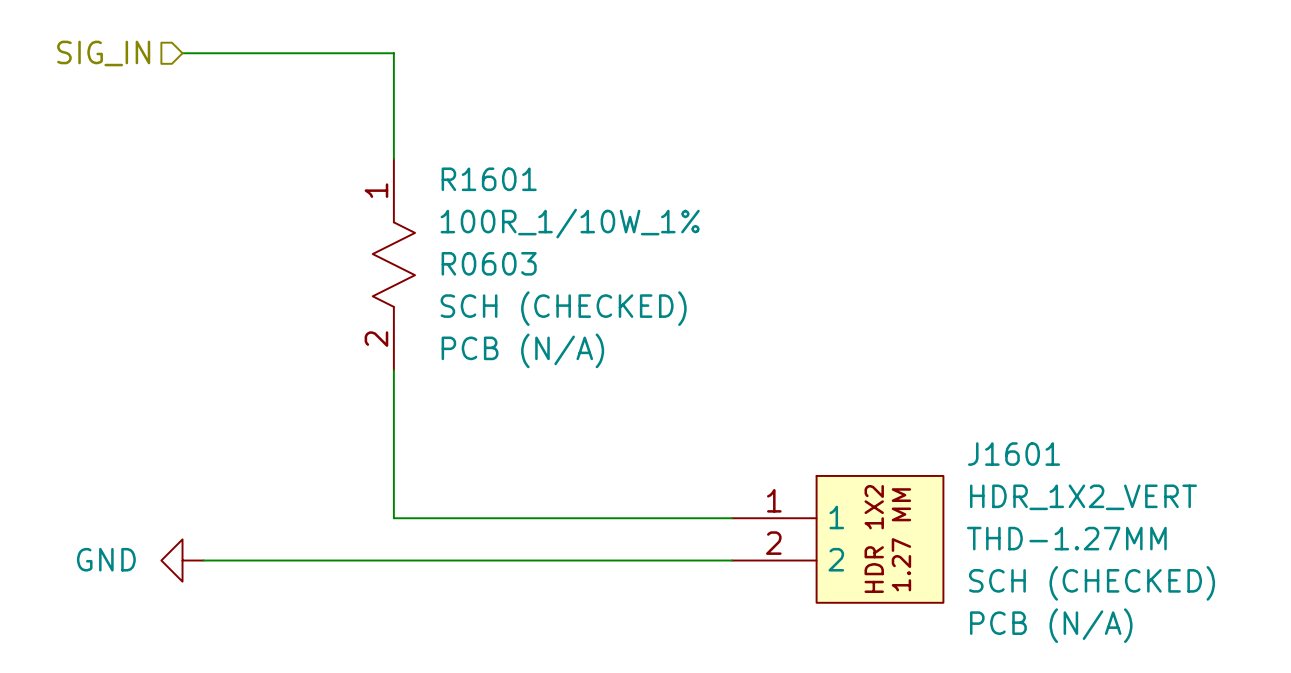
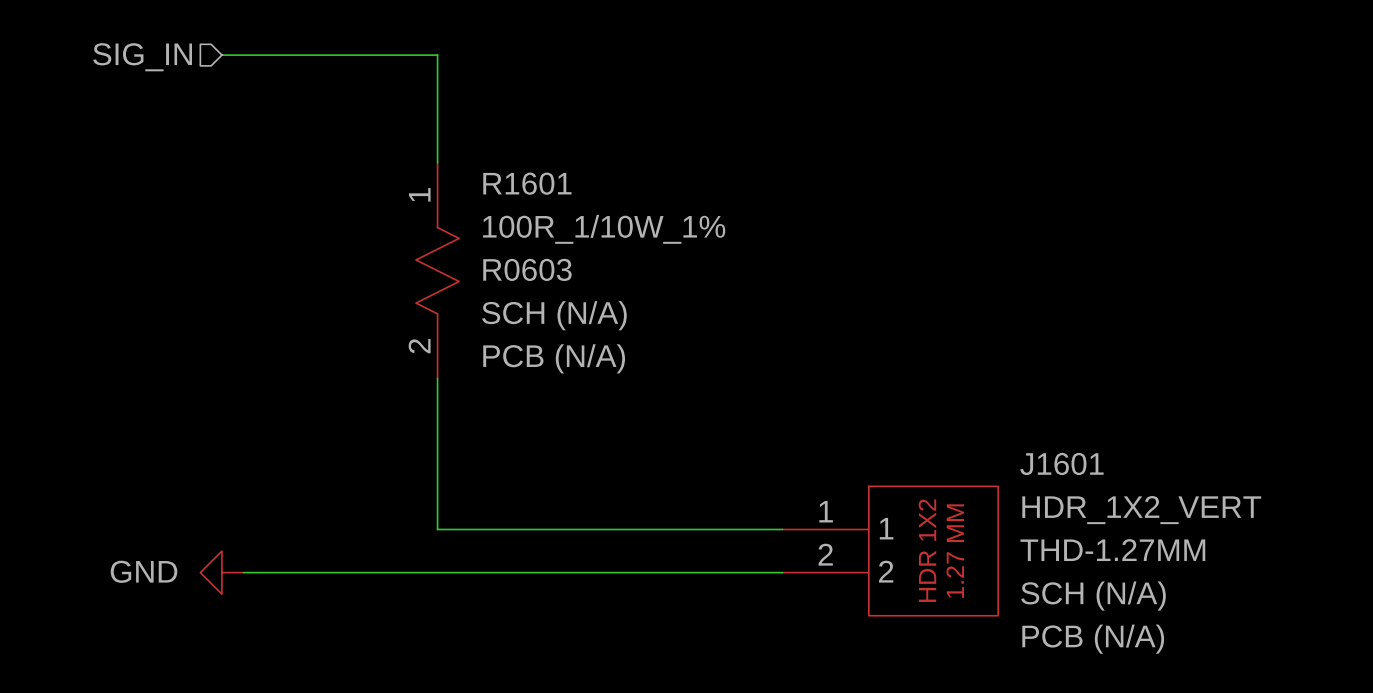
R1601 text: SCH (CHECKED) (563, 308) -> SCH (N/A) (554, 315)
J1601 text: SCH (CHECKED) (1092, 583) -> SCH (N/A) (1093, 596)

